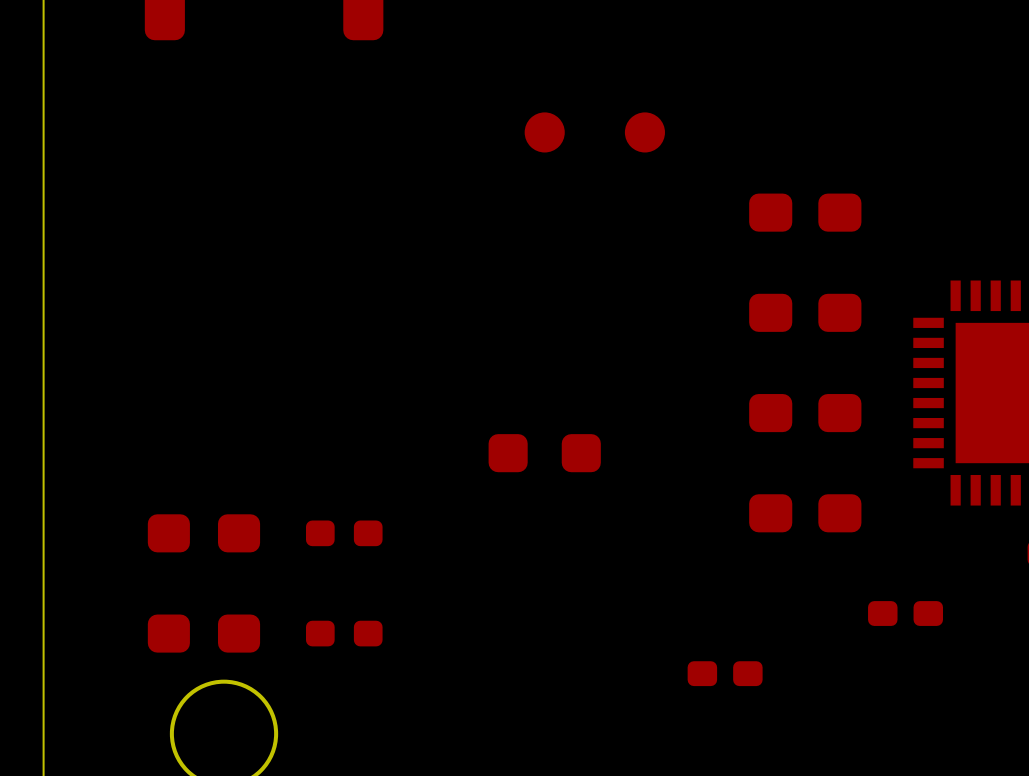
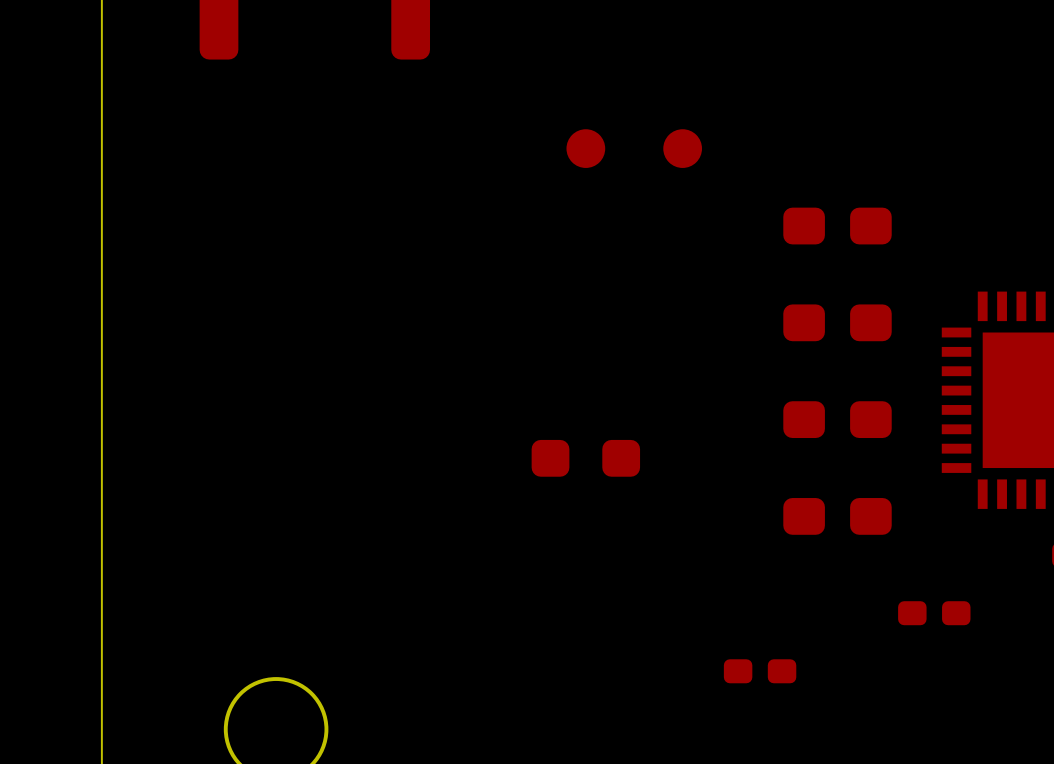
part: (203, 533) -> none
part: (344, 533) -> none
part: (203, 633) -> none
part: (344, 633) -> none

